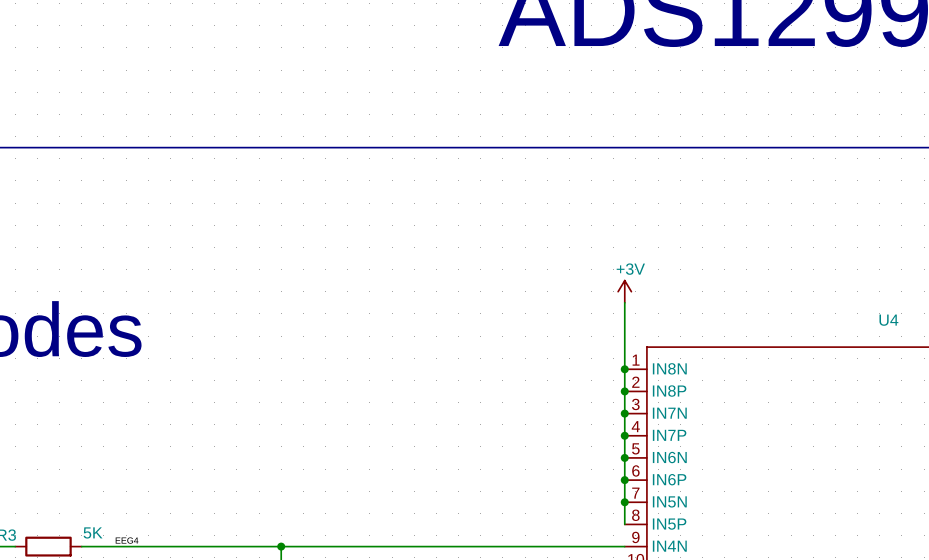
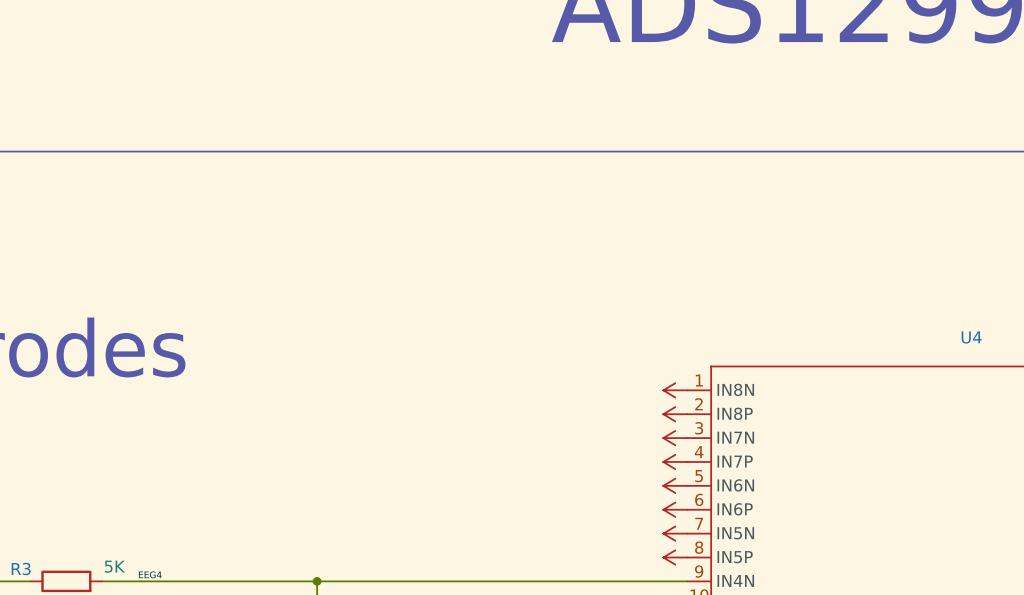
power symbol: +3V (624, 291) -> none
wire: (624, 302) (624, 524) -> none
power symbol: none -> (675, 390)
junction: (624, 369) -> none
power symbol: none -> (675, 414)
junction: (624, 391) -> none
power symbol: none -> (675, 438)
junction: (624, 413) -> none
power symbol: none -> (675, 461)
junction: (624, 435) -> none
power symbol: none -> (675, 485)
junction: (624, 457) -> none
power symbol: none -> (675, 509)
junction: (624, 480) -> none
power symbol: none -> (675, 533)
junction: (624, 502) -> none
power symbol: none -> (675, 557)

